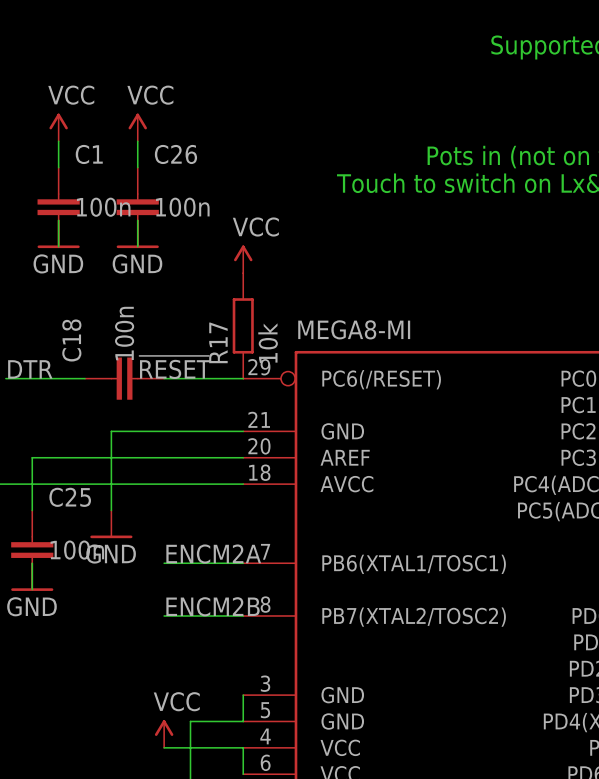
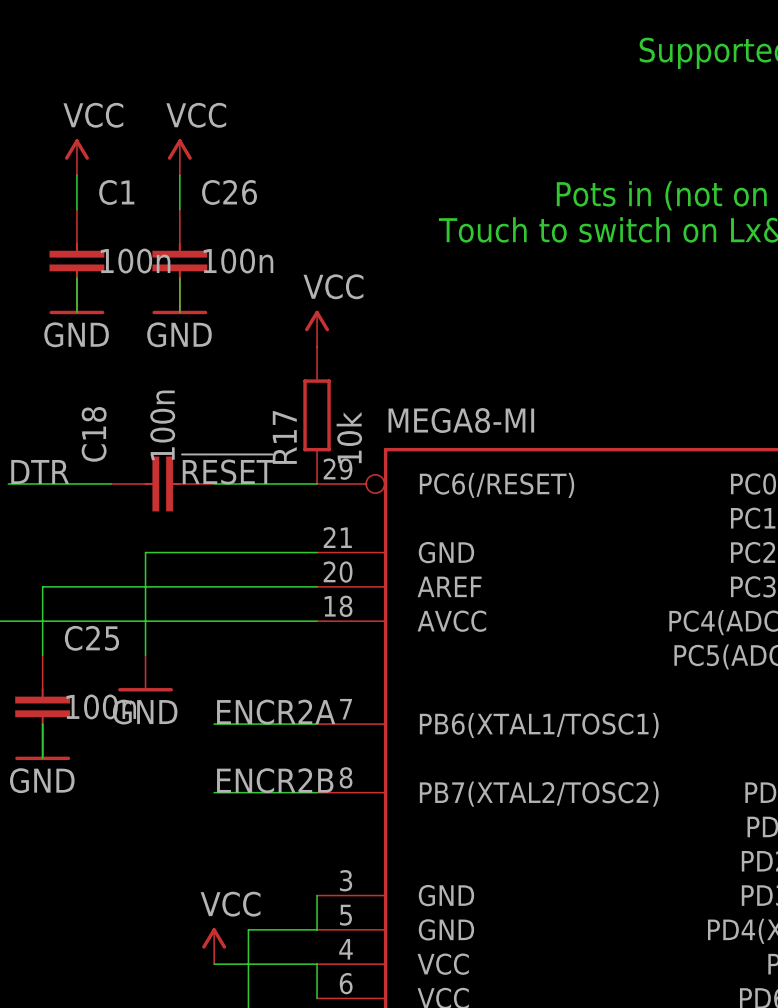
label: ENCM2A (213, 554) -> ENCR2A (276, 712)
label: ENCM2B (213, 606) -> ENCR2B (275, 780)

